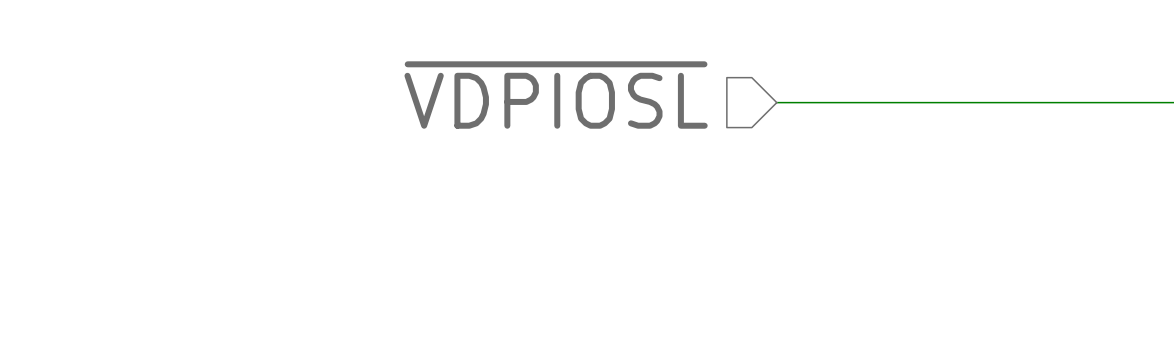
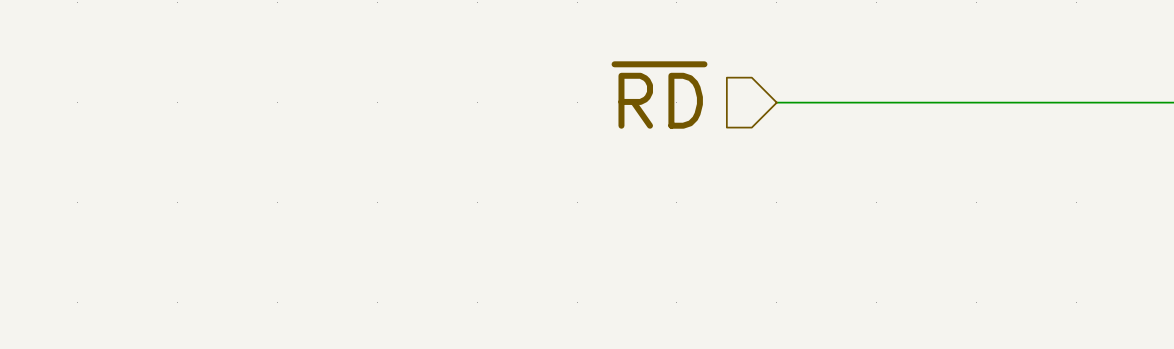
hierarchical label: ~{VDPIOSL} (556, 95) -> ~{RD} (659, 95)

